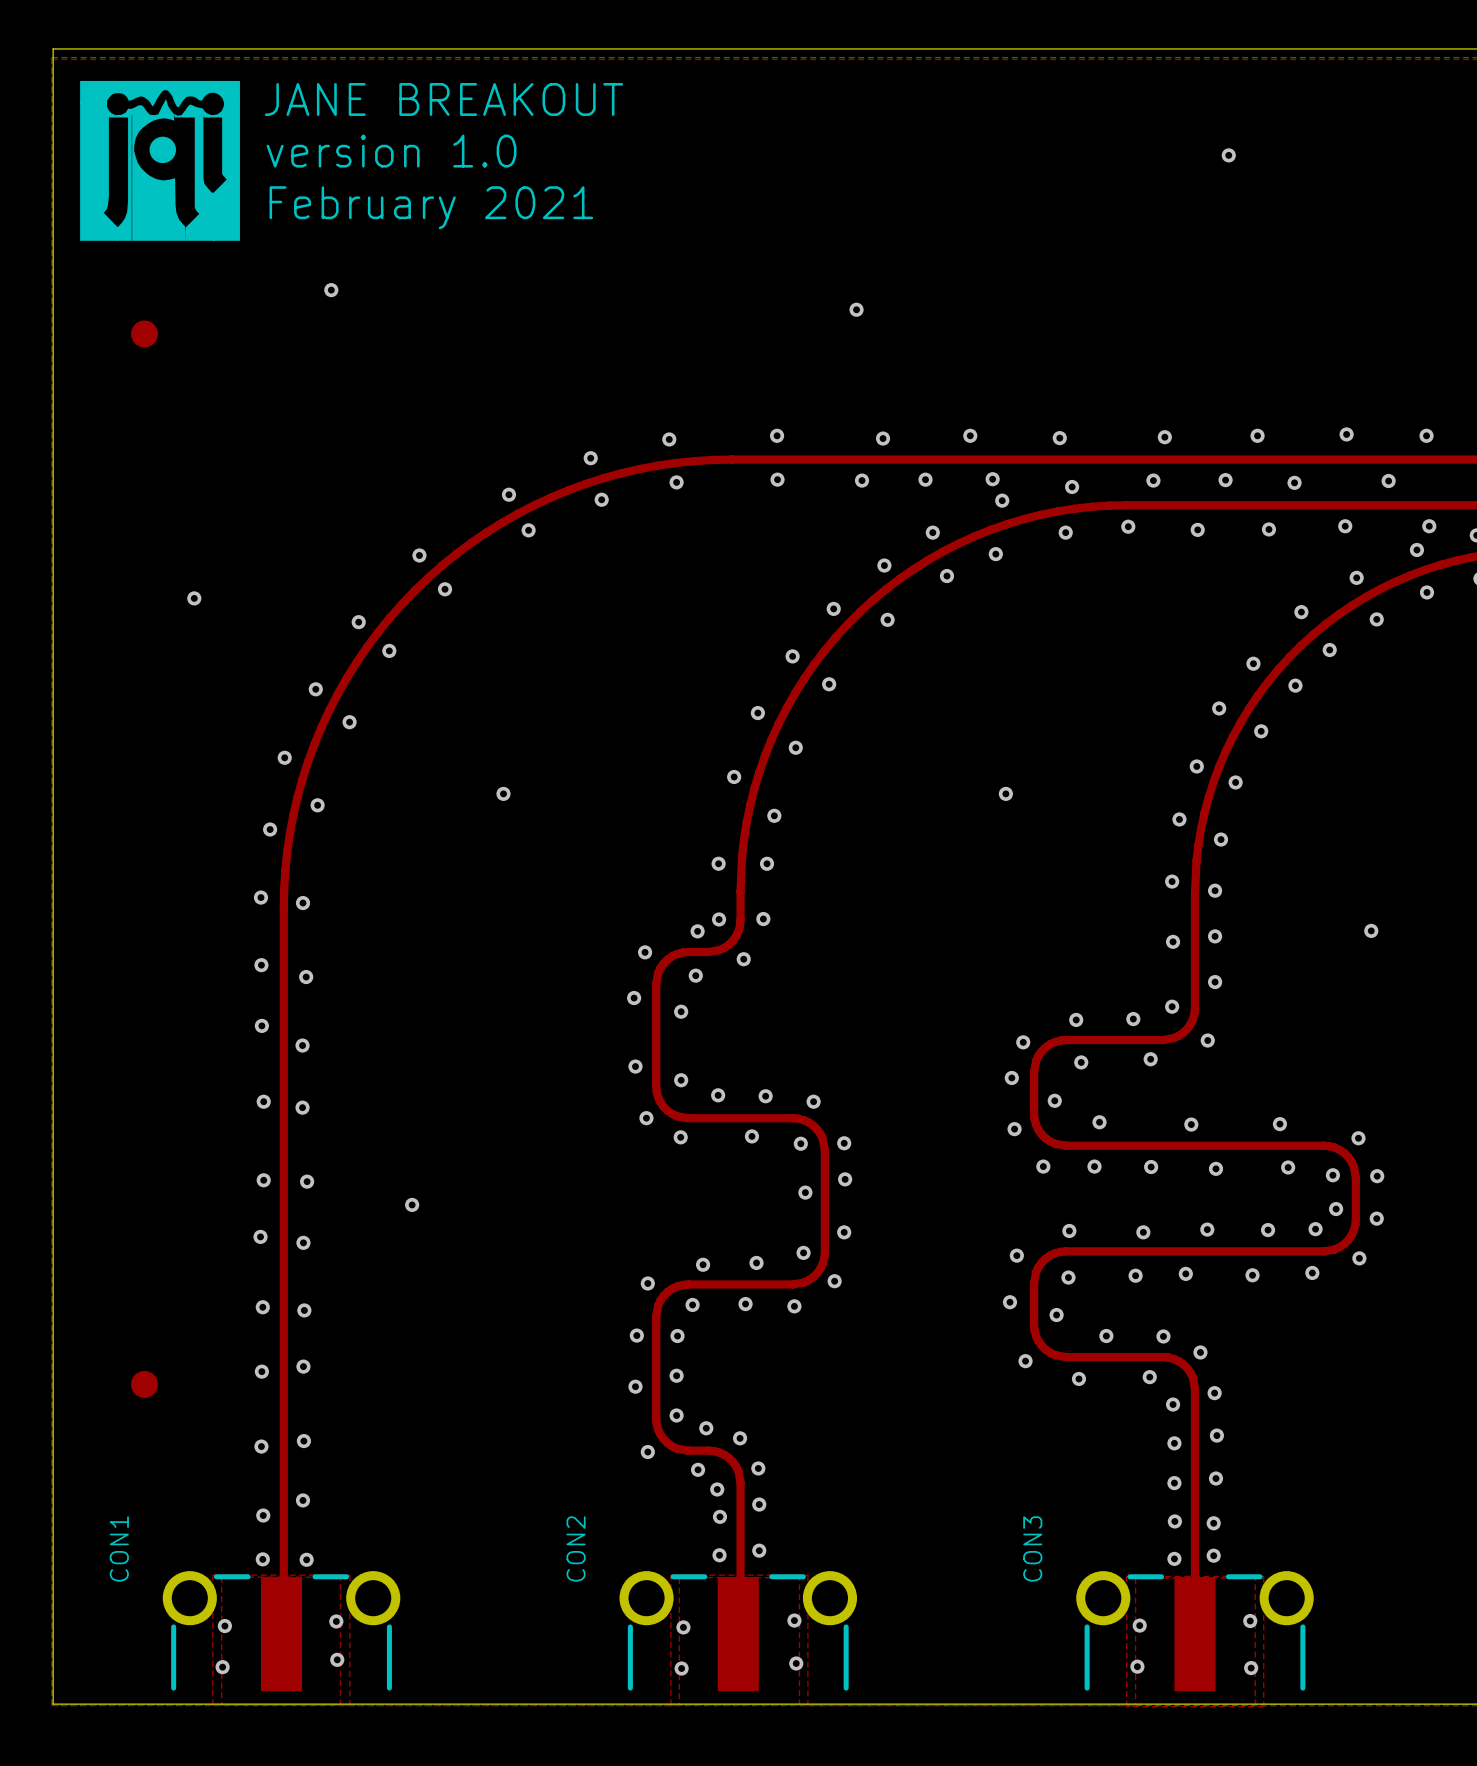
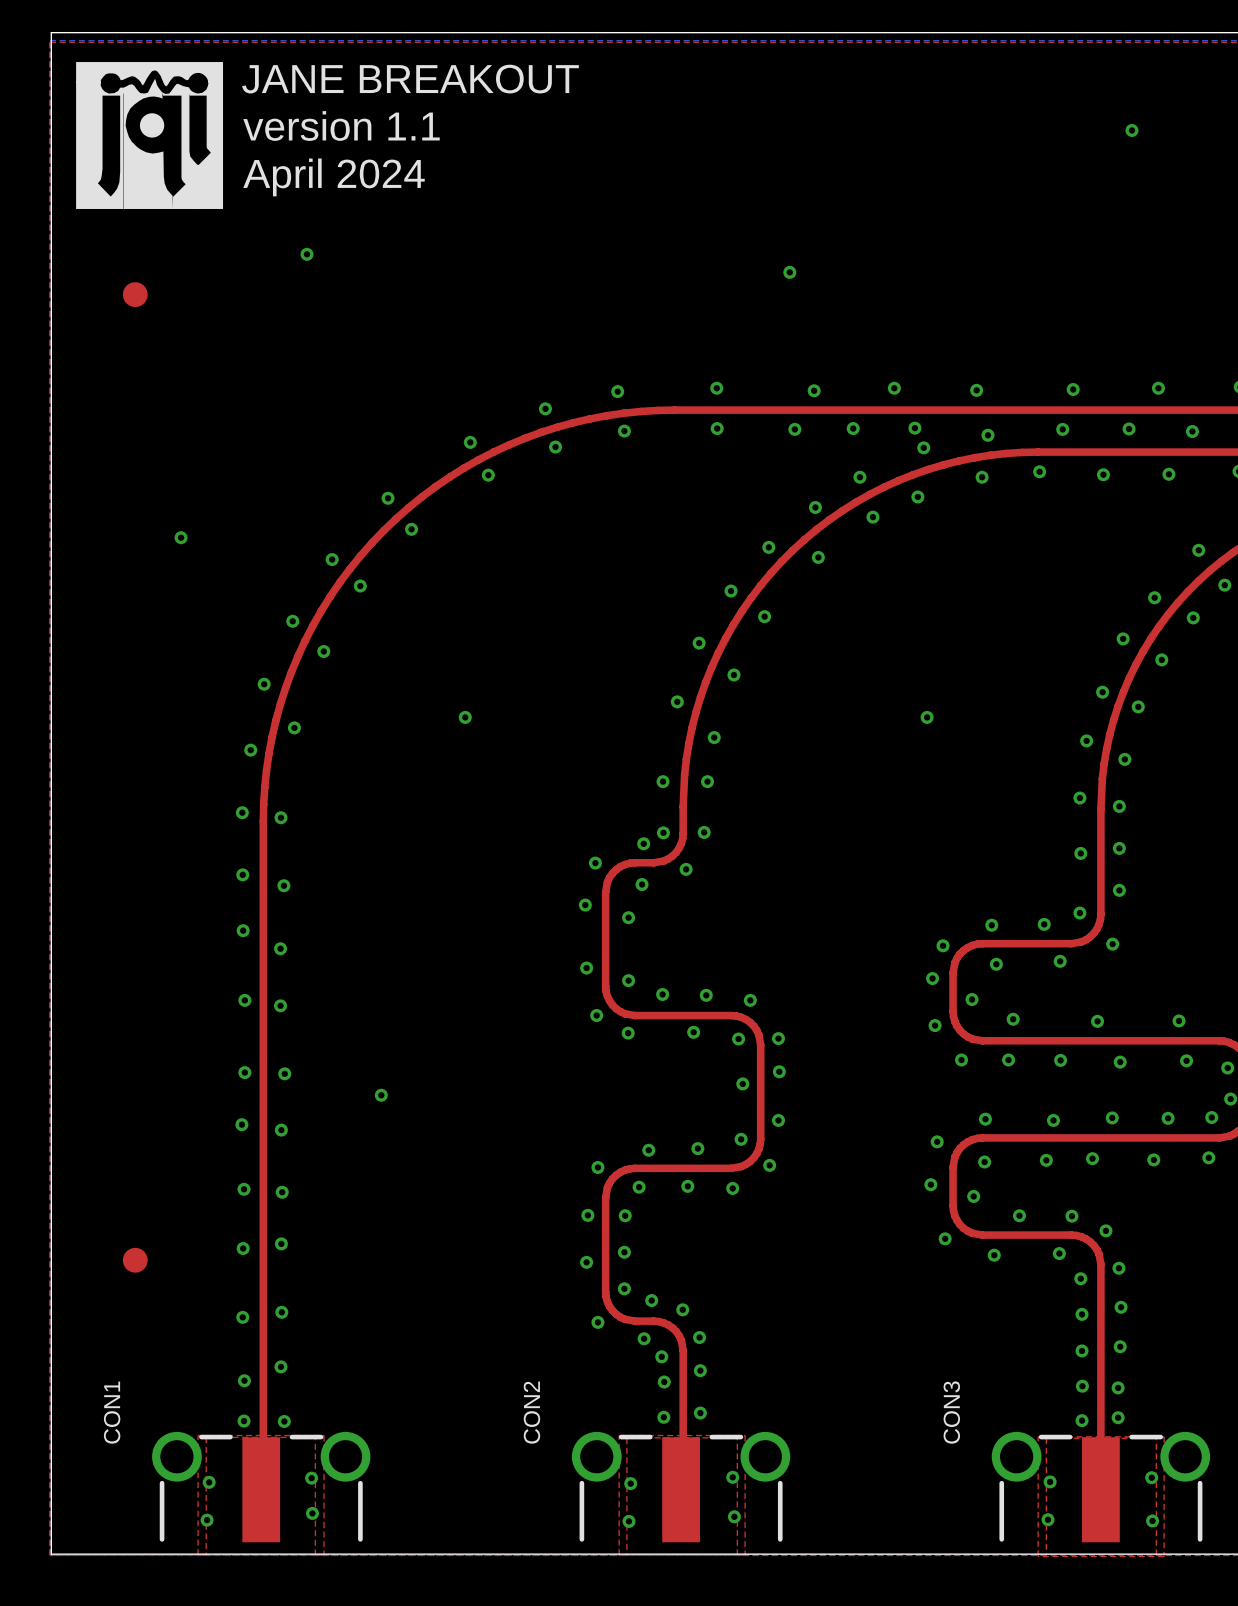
text: version 1.0 (391, 151) -> version 1.1 (341, 125)
text: February 2021 (431, 207) -> April 2024 (334, 177)

